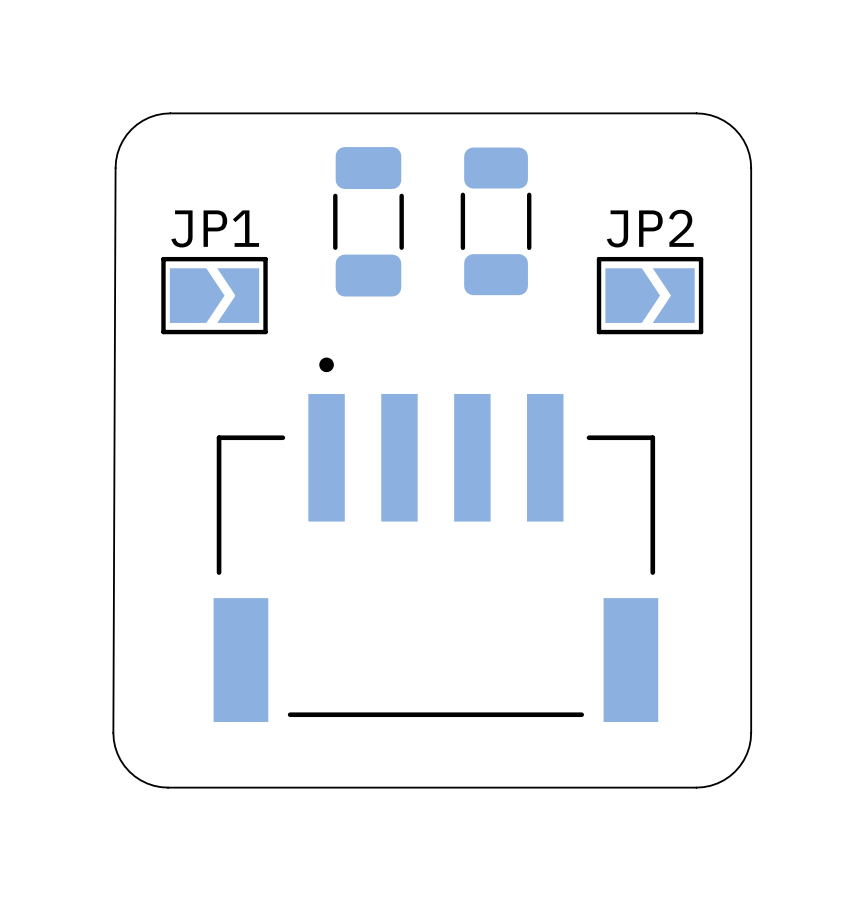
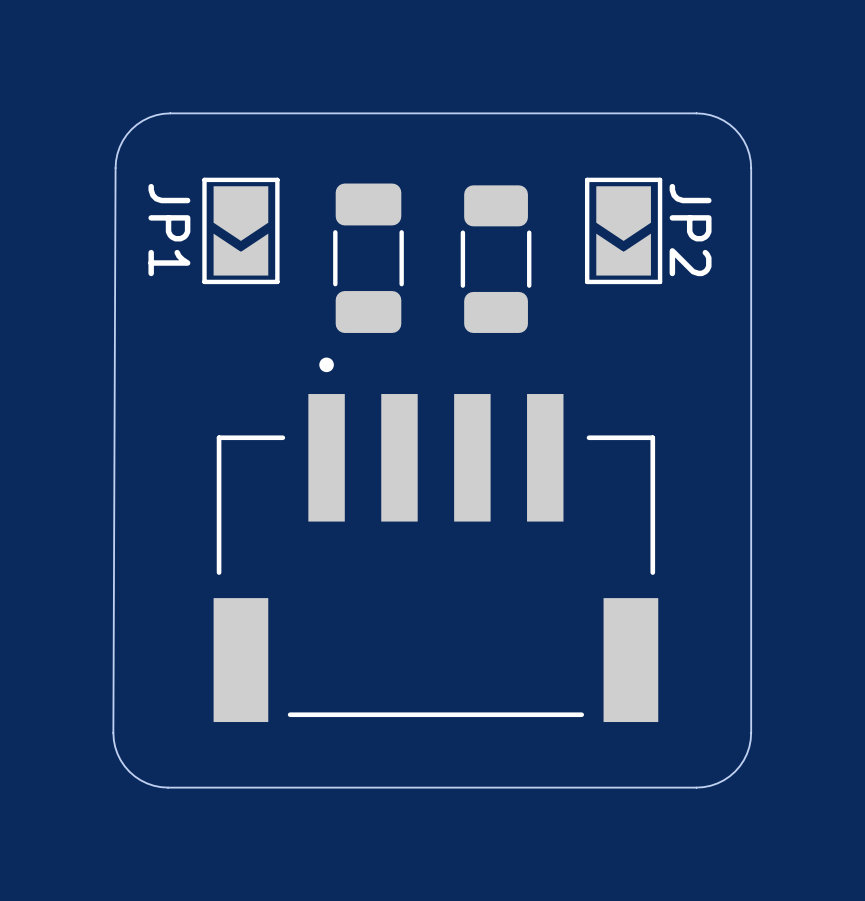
part position: (368, 221) -> (368, 258)
part position: (496, 221) -> (496, 259)
JP1 name position: JP1 (215, 228) -> JP1 (169, 230)
JP1 rotation: 0° (214, 295) -> 90° clockwise (240, 230)
JP1 position: (214, 295) -> (240, 230)
JP2 rotation: 0° (650, 295) -> 90° clockwise (623, 230)
JP2 position: (650, 295) -> (623, 230)

